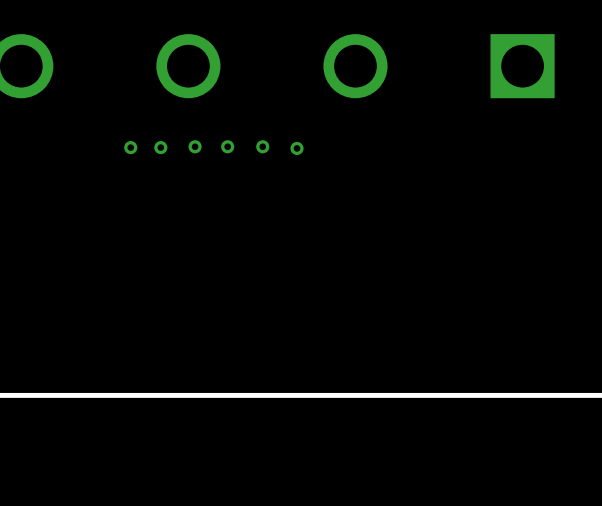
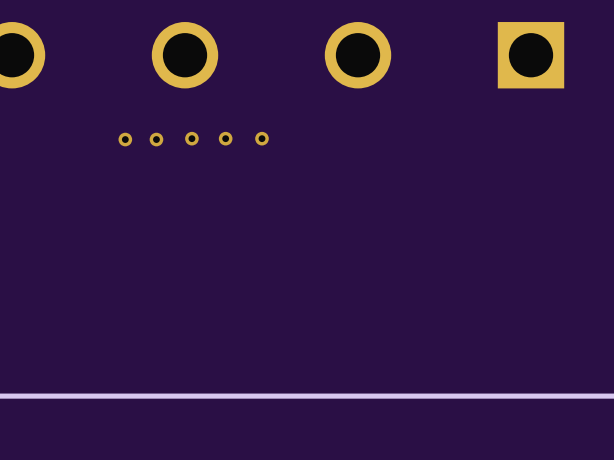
via: (297, 148) -> none

